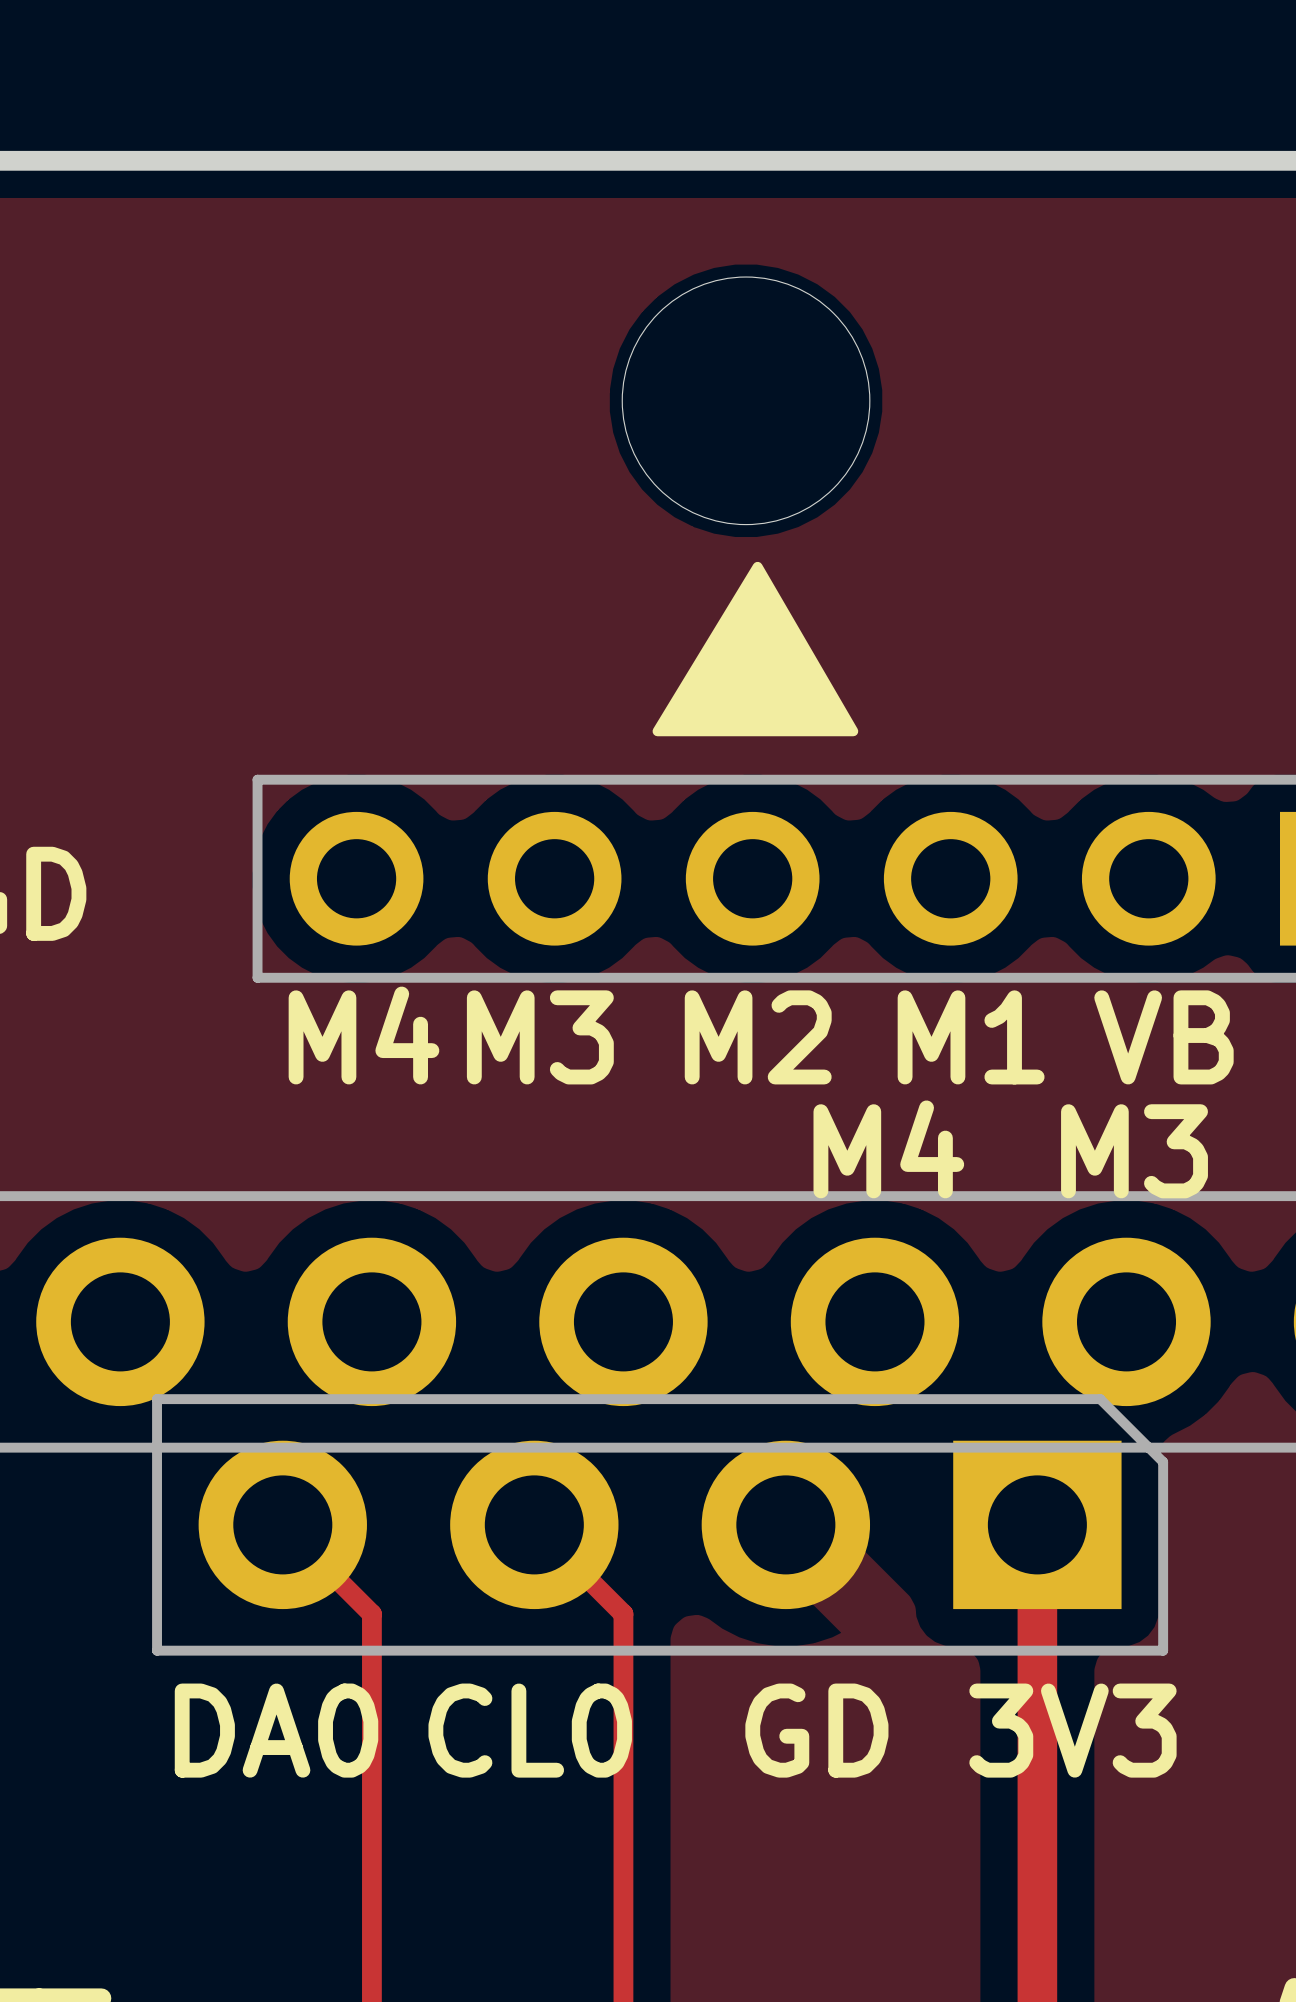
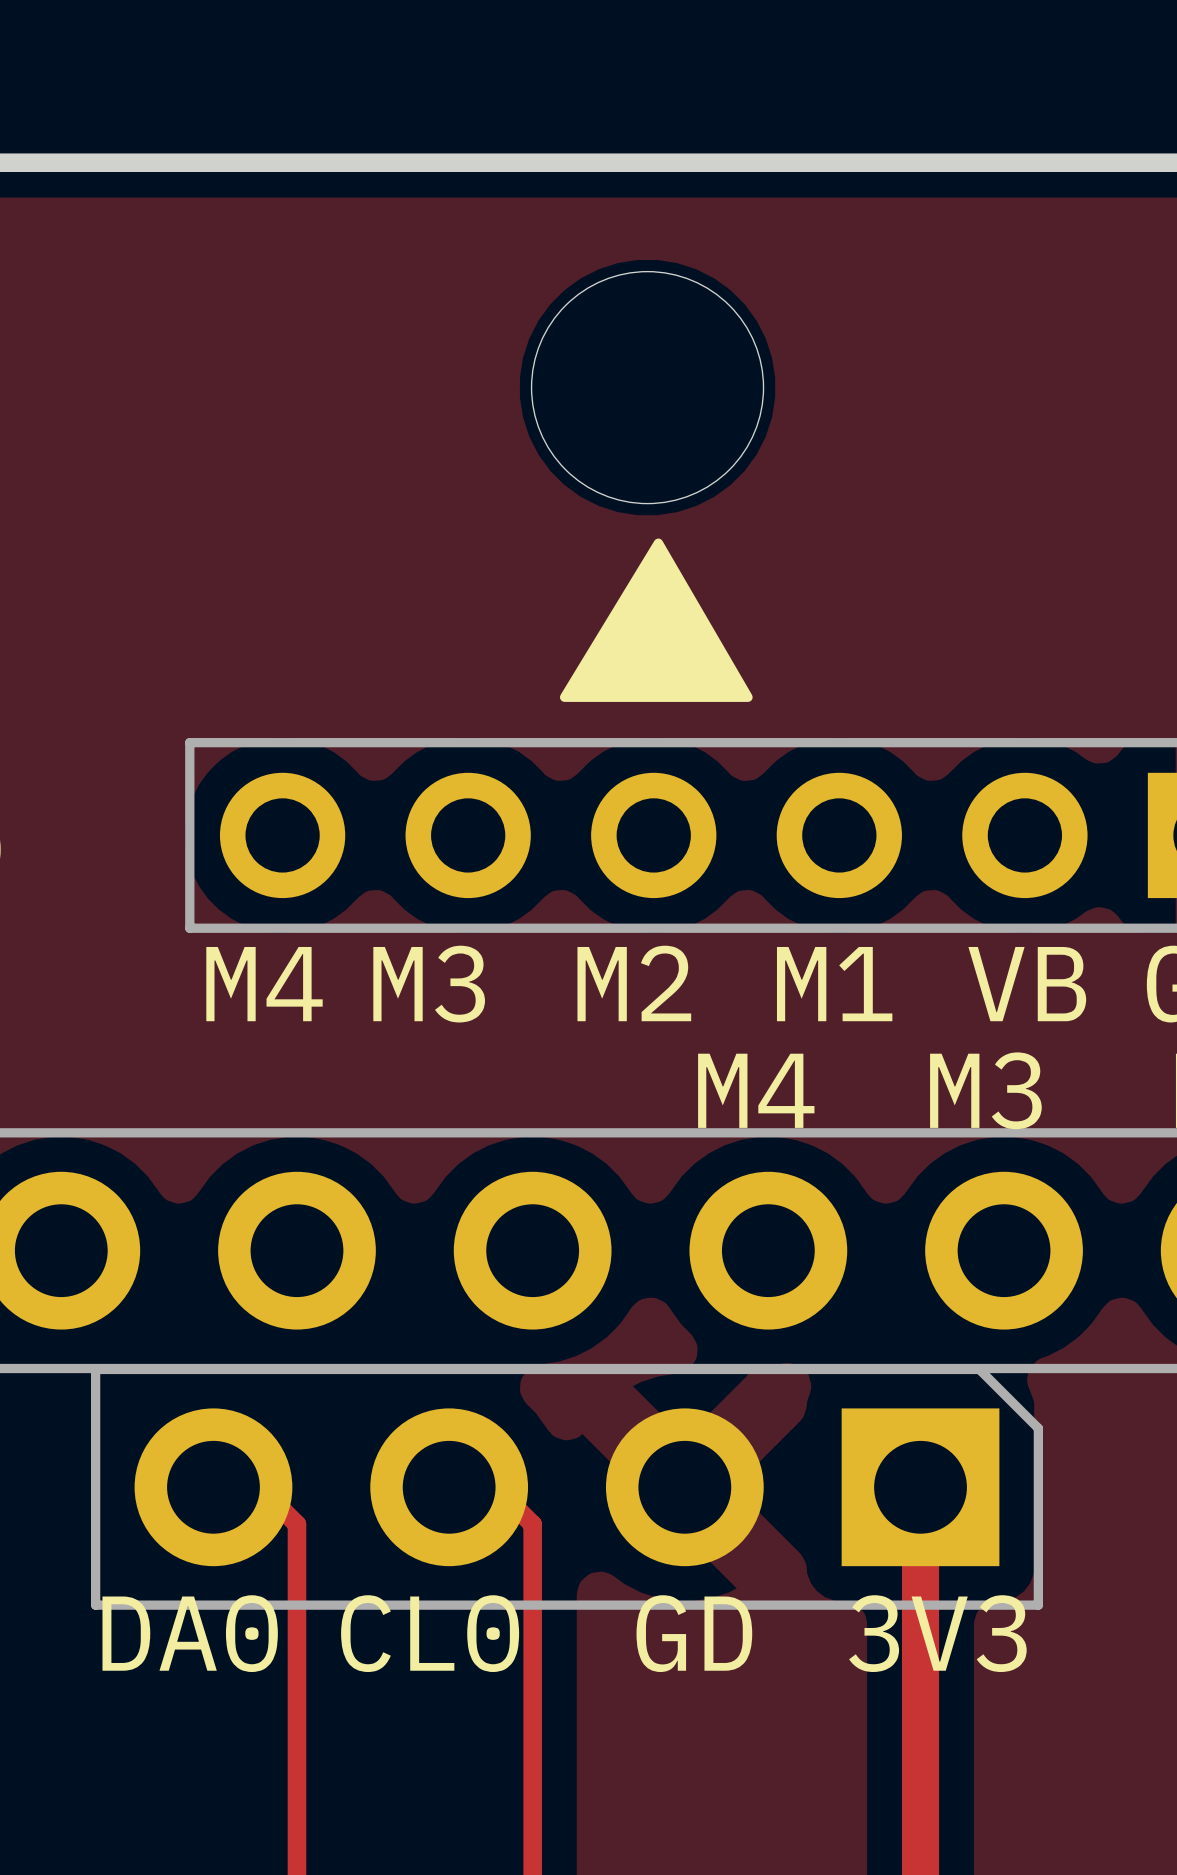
part position: (660, 1524) -> (567, 1487)

